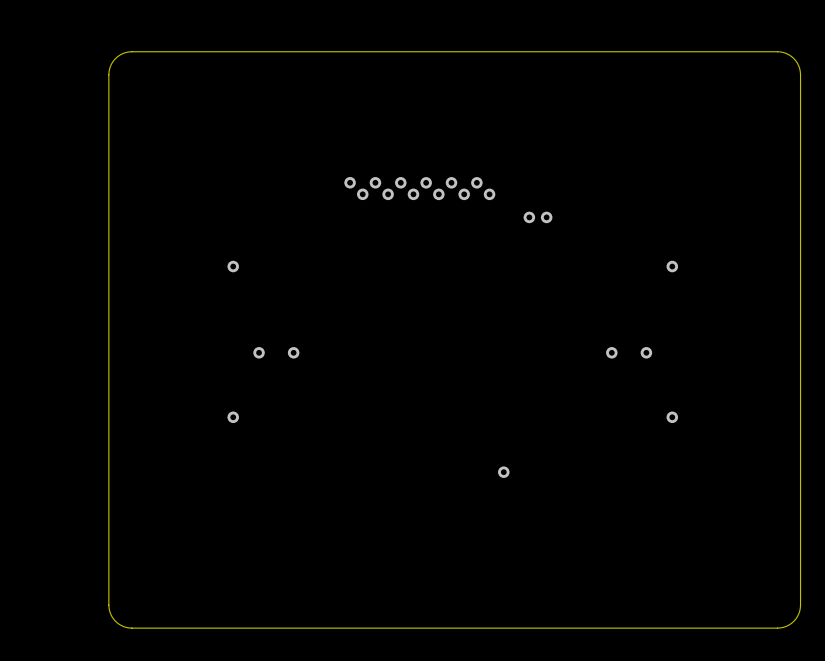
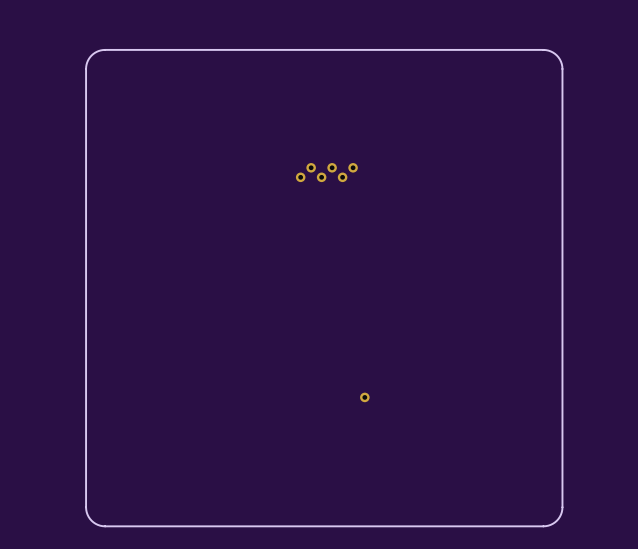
board edge: (189, 51) (126, 52) (113, 60) (108, 74) (109, 608) (115, 621) (125, 627) (189, 628) -> (105, 49) (91, 55) (86, 68) (86, 507) (91, 520) (105, 526)
board edge: (719, 51) (783, 52) (795, 60) (800, 74) (800, 608) (795, 619) (783, 627) (719, 628) -> (543, 49) (556, 55) (562, 68) (562, 507) (556, 520) (543, 526)
via: (350, 182) -> none
via: (375, 182) -> none
via: (400, 182) -> none
via: (426, 182) -> none
via: (451, 182) -> none
via: (476, 182) -> none
via: (362, 194) -> none
via: (388, 194) -> none
via: (413, 194) -> none
via: none -> (300, 177)
via: none -> (321, 177)
via: none -> (342, 177)
via: (529, 217) -> none
via: (546, 217) -> none
via: (233, 266) -> none
via: (672, 266) -> none
via: (259, 352) -> none
via: (293, 352) -> none
via: (611, 352) -> none
via: (646, 352) -> none
via: (233, 417) -> none
via: (672, 417) -> none

